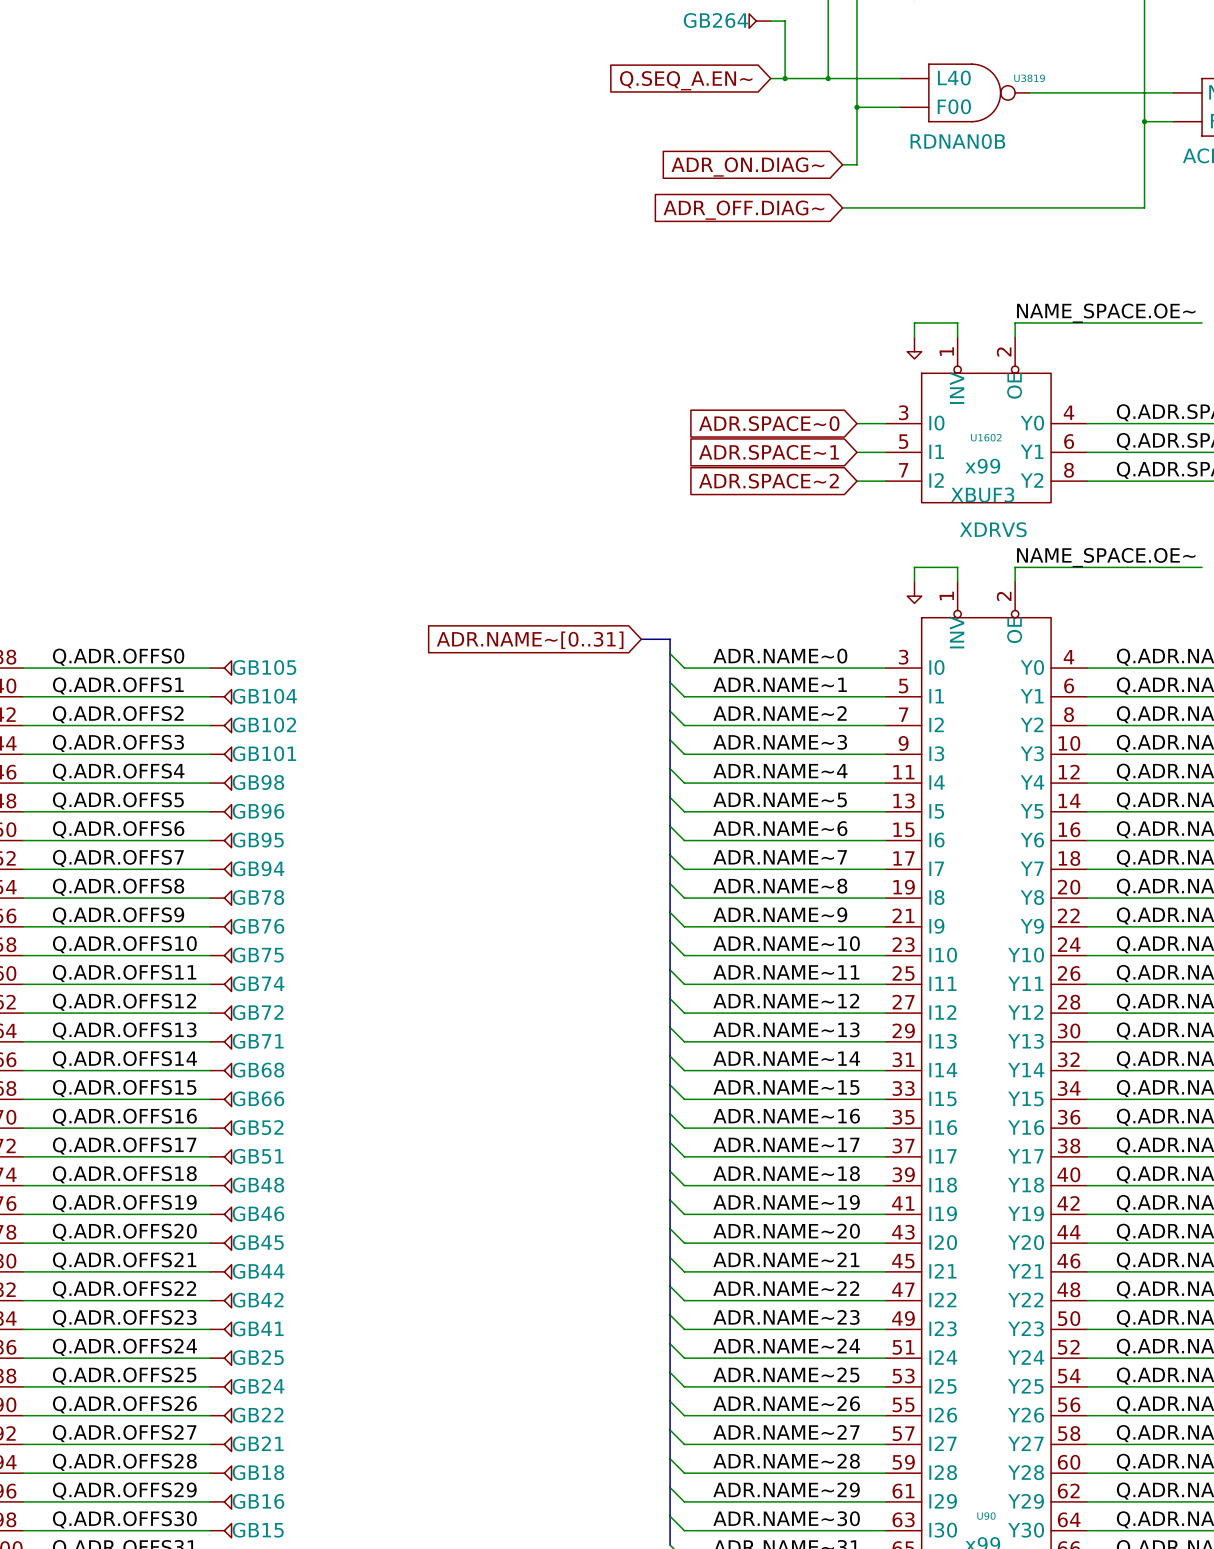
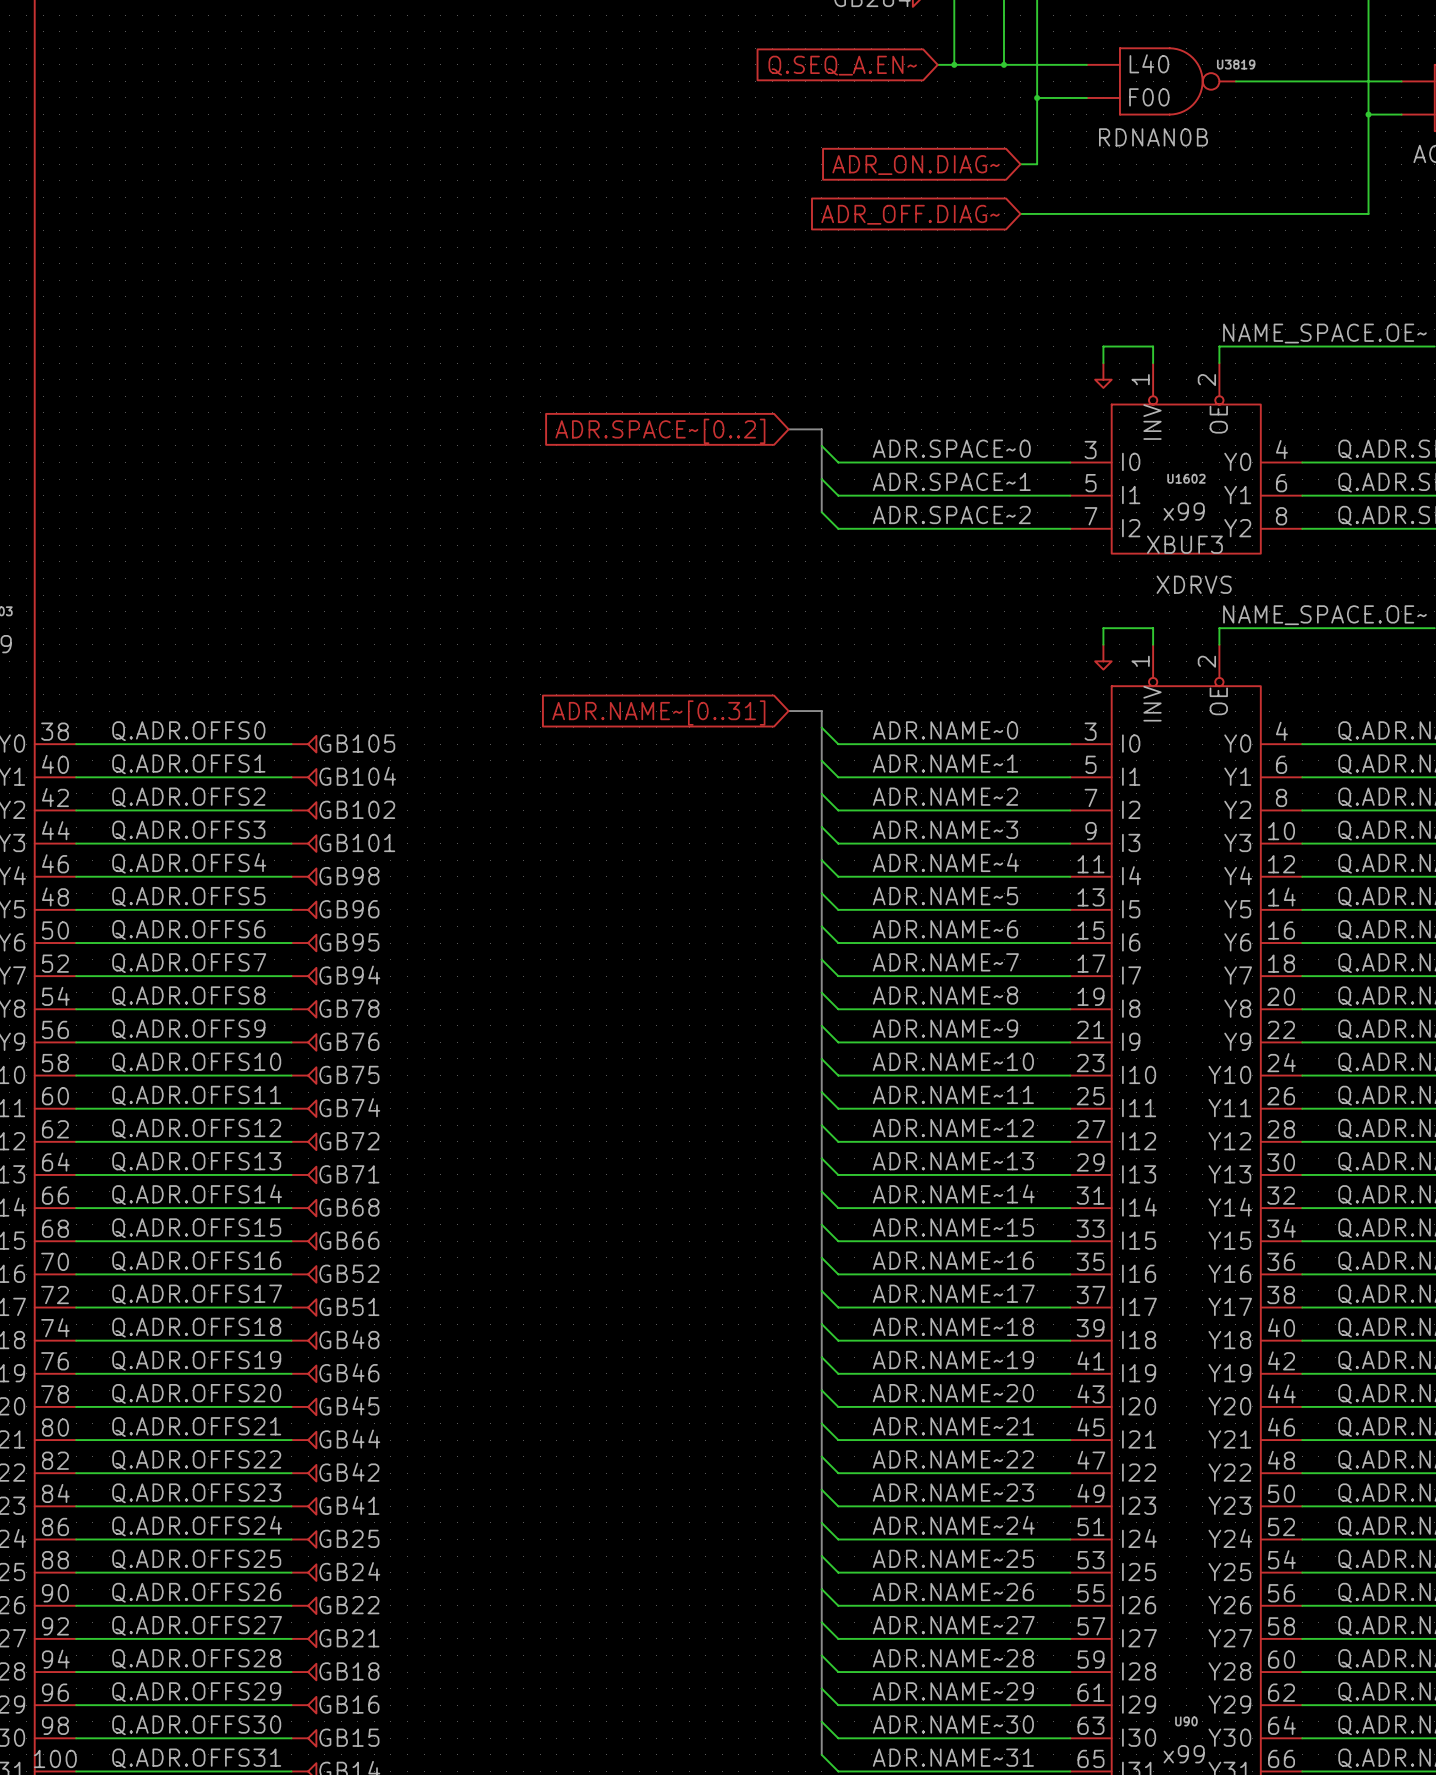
bus: none -> (788, 429) (821, 429) (821, 512)
global label: none -> ADR.SPACE~[0..2] (660, 431)
wire: none -> (821, 445) (838, 462) (1037, 462)
label: none -> ADR.SPACE~0 (951, 448)
global label: ADR.SPACE~0 (769, 423) -> none
wire: none -> (821, 479) (838, 495) (1037, 495)
label: none -> ADR.SPACE~1 (951, 481)
global label: ADR.SPACE~1 (769, 452) -> none
wire: none -> (821, 512) (838, 528) (1037, 528)
label: none -> ADR.SPACE~2 (951, 514)
global label: ADR.SPACE~2 (768, 481) -> none

